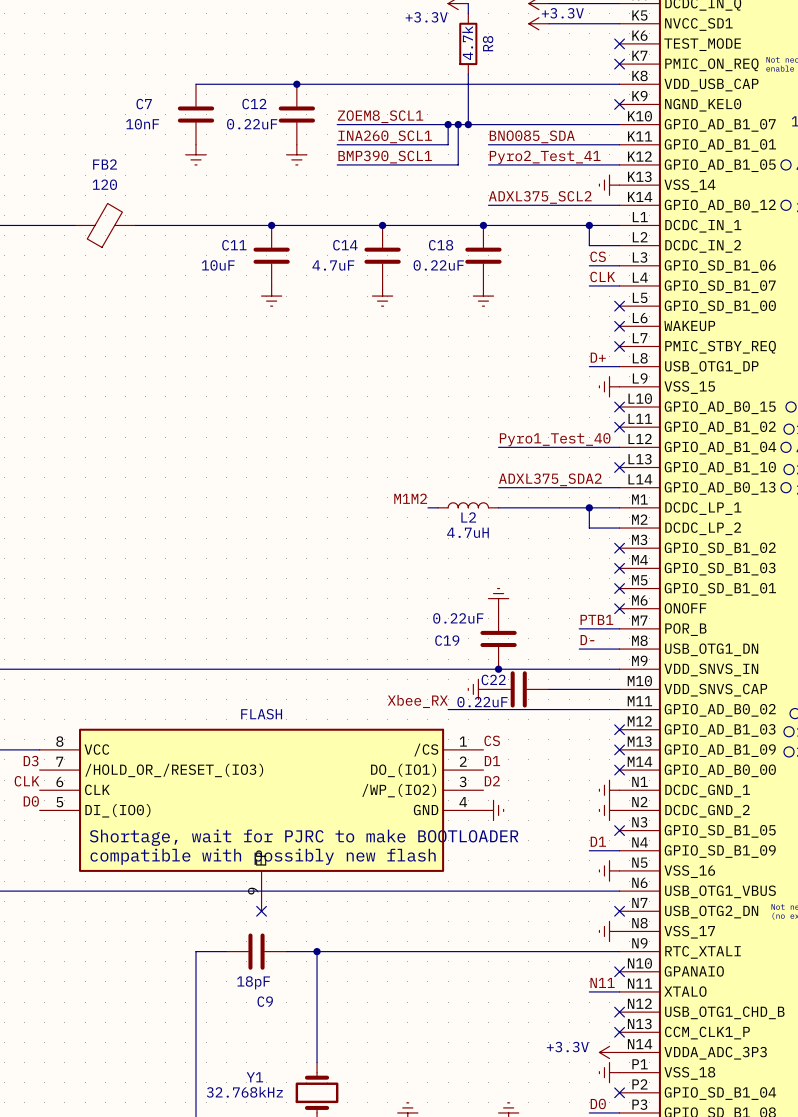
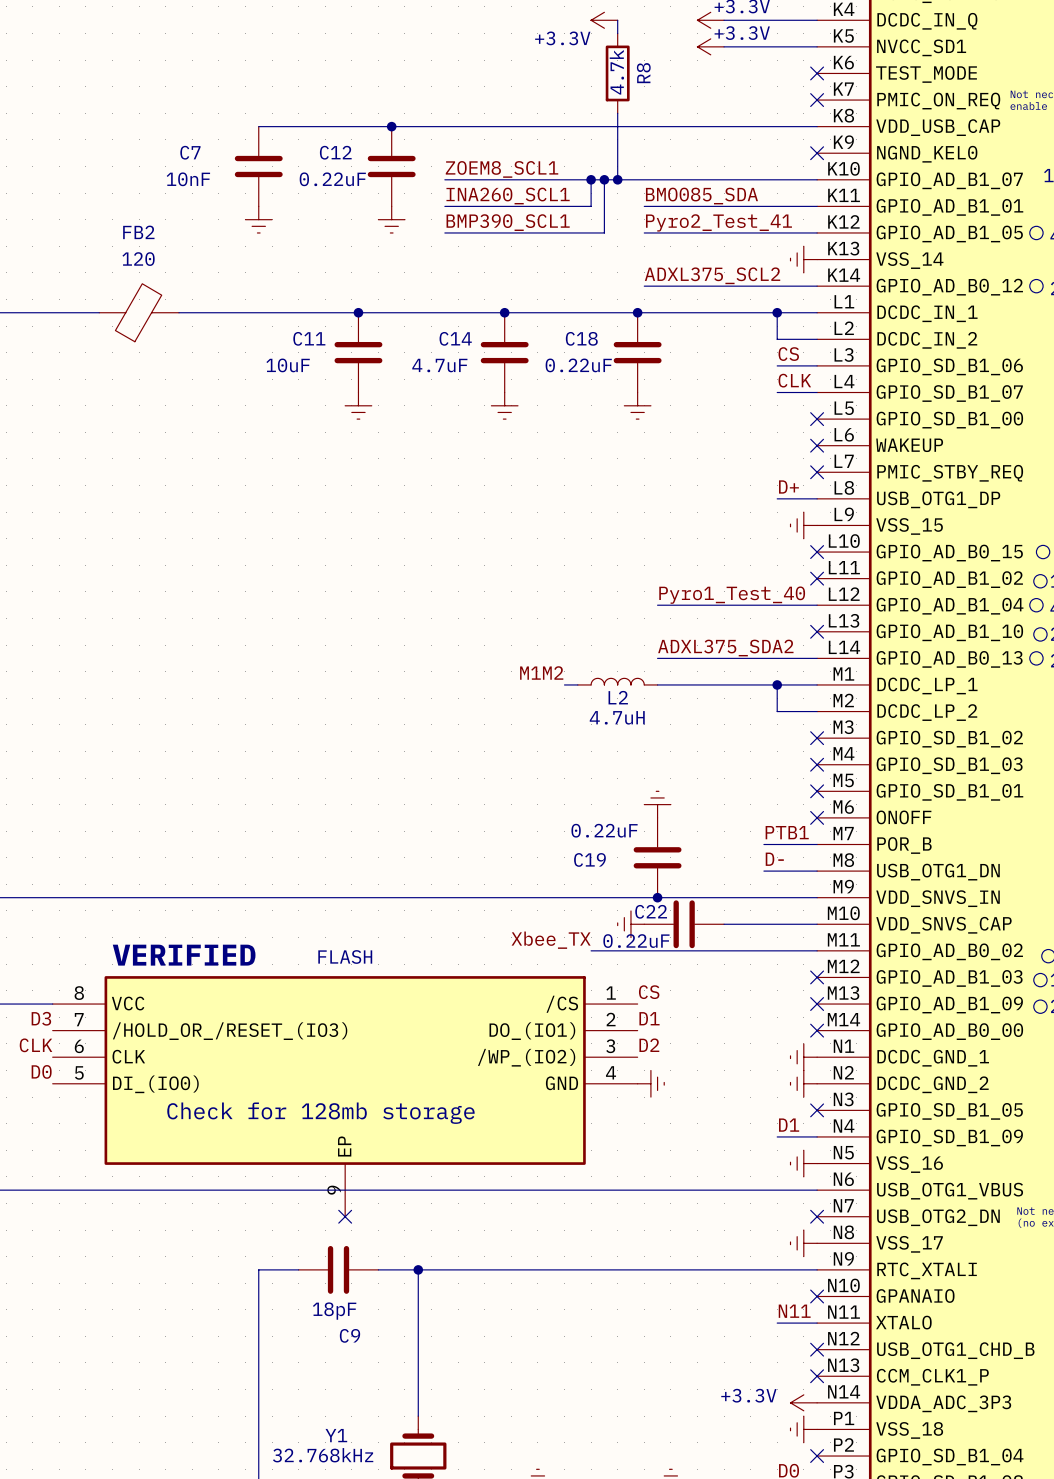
label: BNO085_SDA (532, 136) -> BMO085_SDA (701, 196)
label: Xbee_RX (417, 701) -> Xbee_TX (551, 940)
text: none -> VERIFIED (184, 955)
text: none -> Check for 128mb storage (320, 1113)
text: Shortage, wait for PJRC to make BOOTLOADER (304, 837) -> none
text: compatible with possibly new flash (263, 856) -> none

